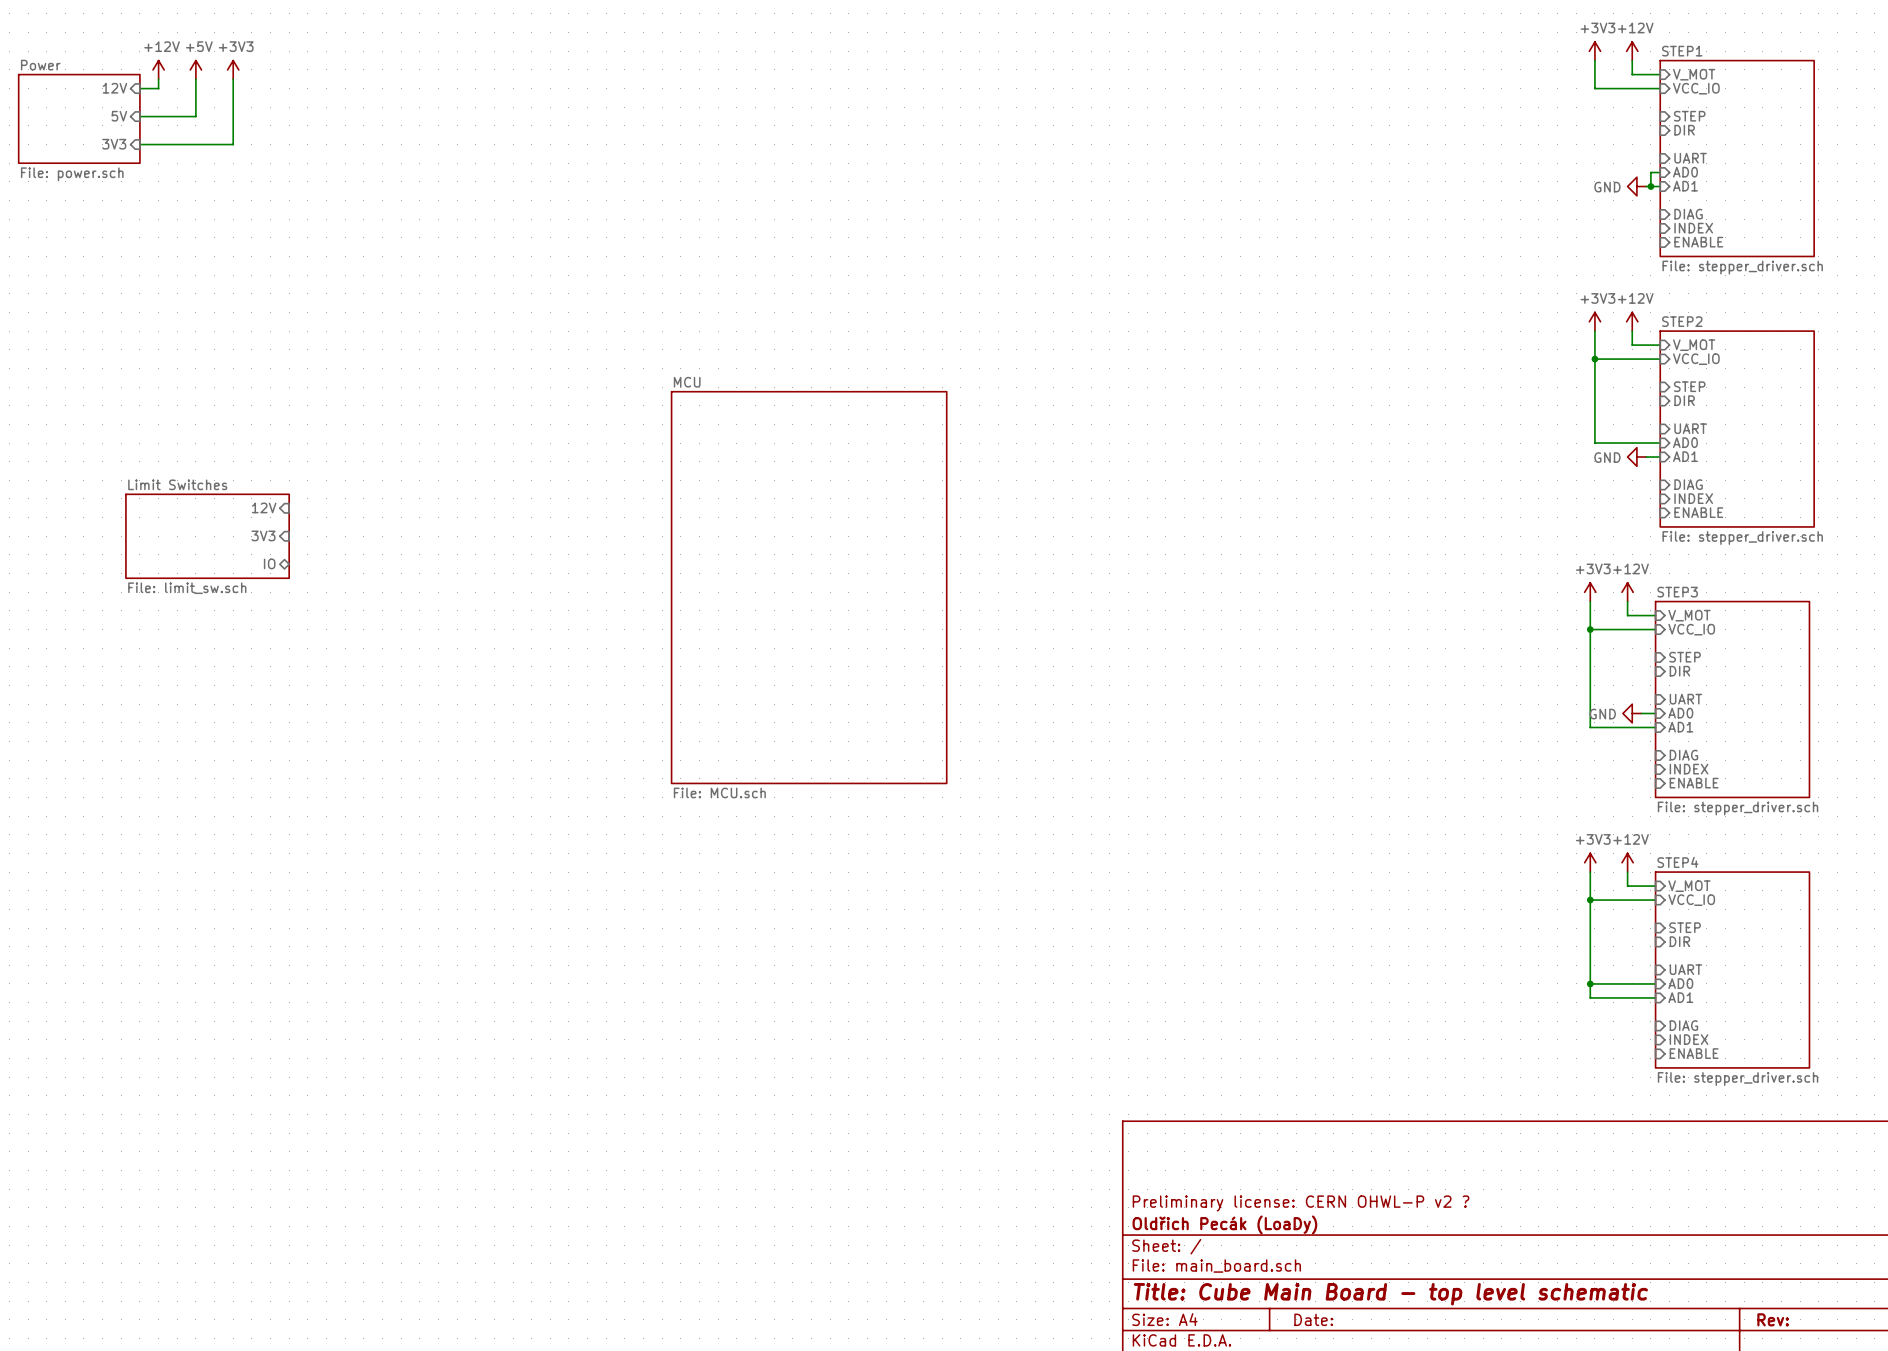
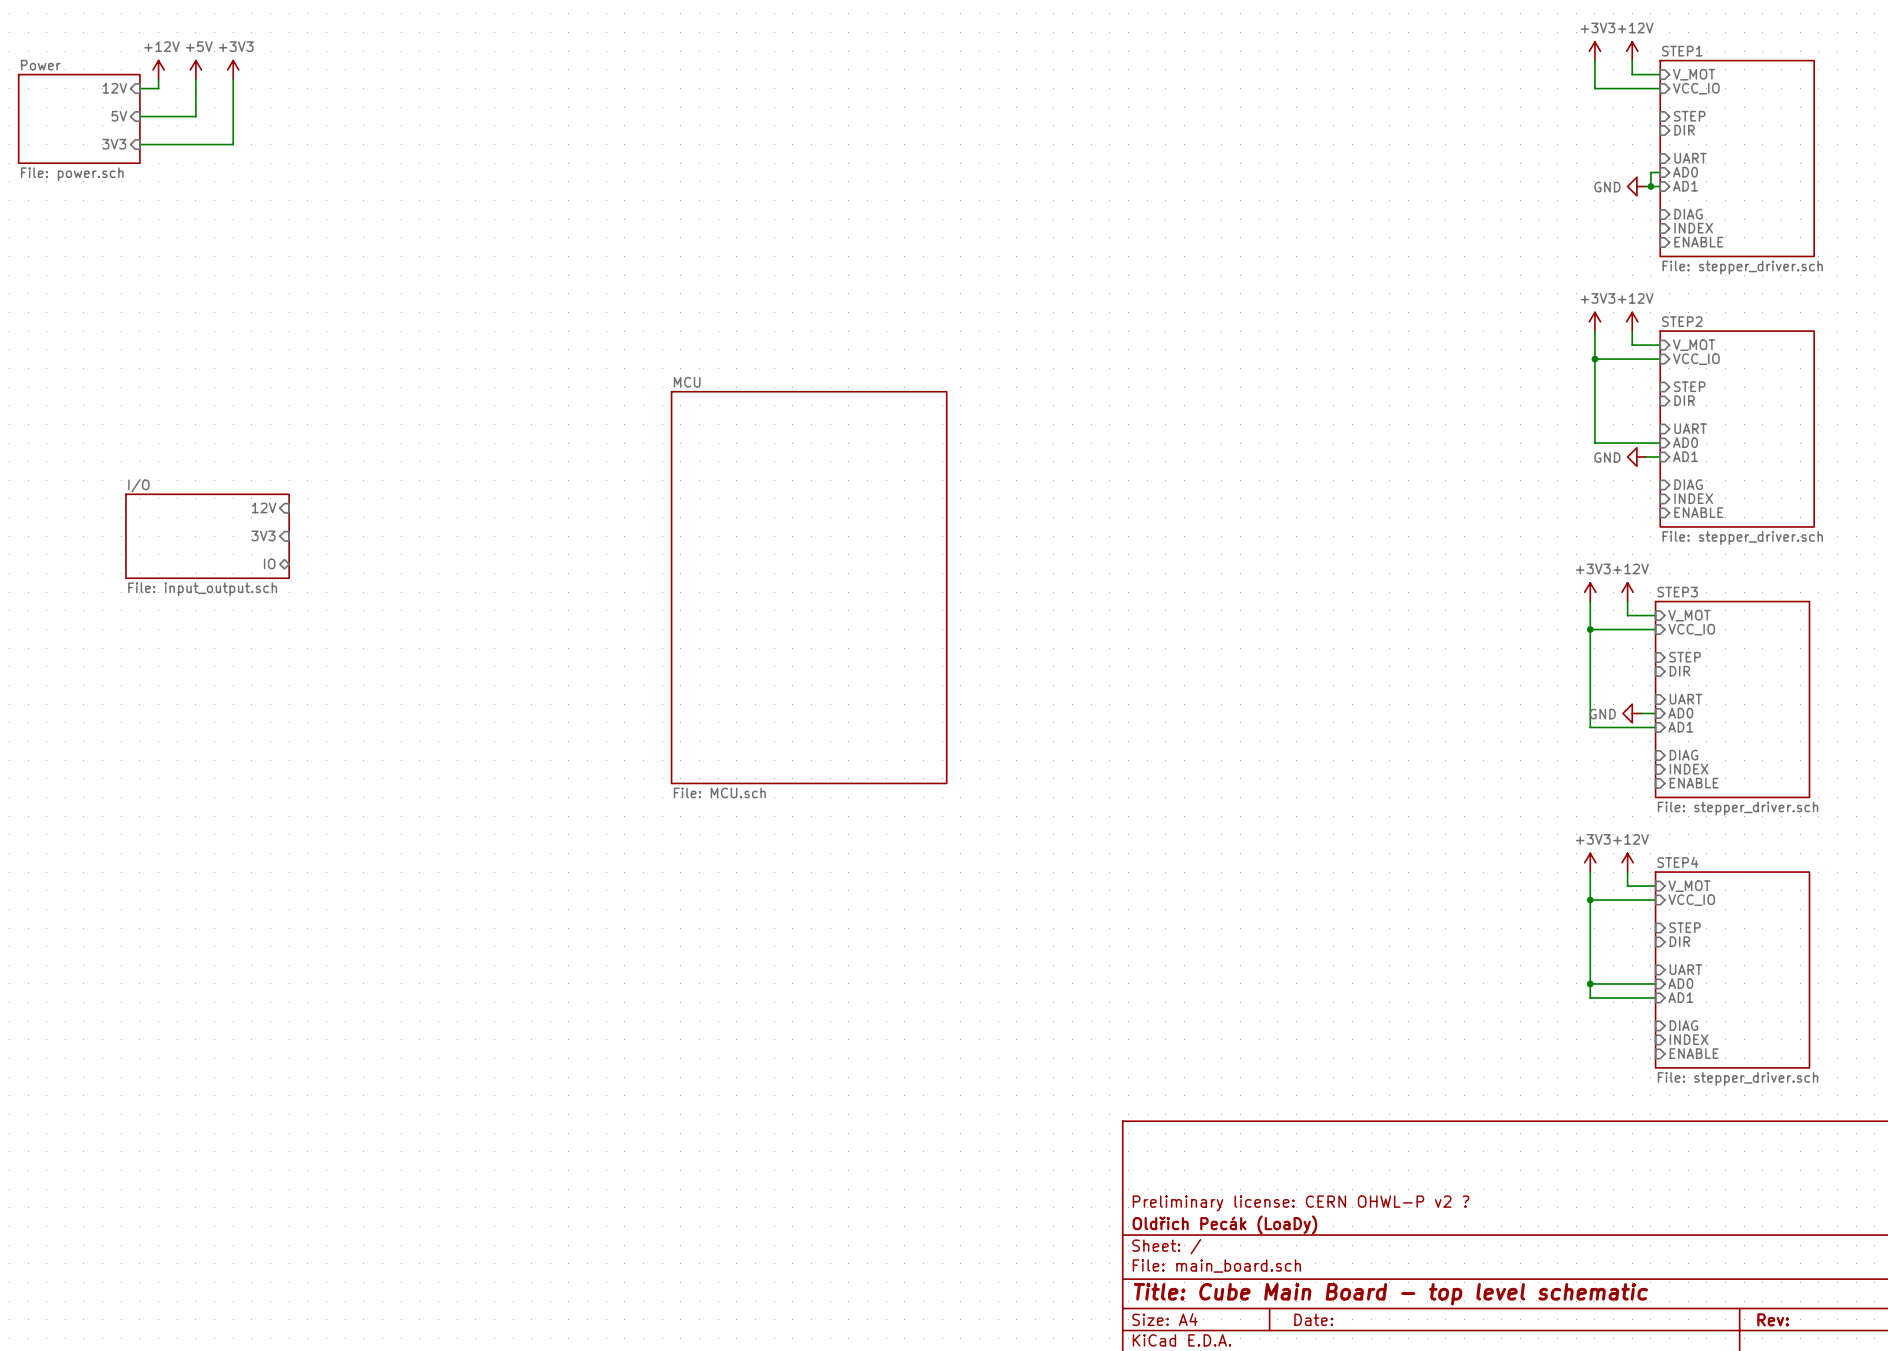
sheet Limit Switches name: Limit Switches (177, 484) -> I/O (138, 485)
sheet Limit Switches value: File: limit_sw.sch (187, 588) -> File: input_output.sch (202, 589)

